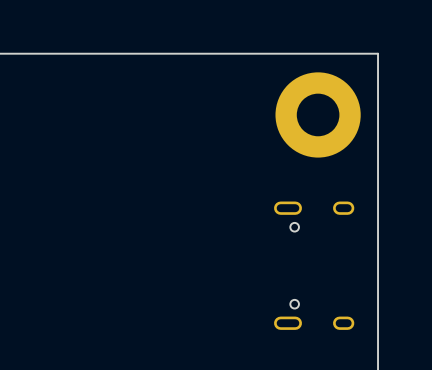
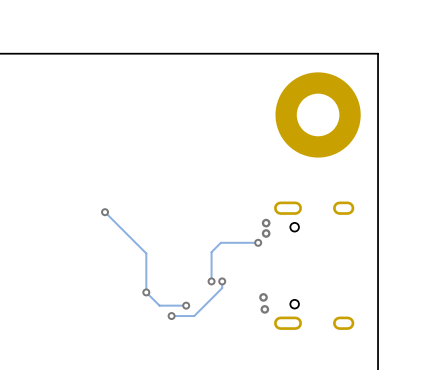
track: none -> (105, 212) (146, 253) (146, 292) (159, 305) (186, 305)
via: none -> (105, 212)
via: none -> (266, 223)
via: none -> (266, 233)
track: none -> (258, 242) (220, 242) (211, 252) (211, 281)
via: none -> (258, 242)
via: none -> (211, 281)
track: none -> (222, 281) (222, 288) (194, 316) (171, 316)
via: none -> (222, 281)
via: none -> (146, 292)
via: none -> (263, 297)
via: none -> (186, 305)
via: none -> (264, 309)
via: none -> (171, 316)

